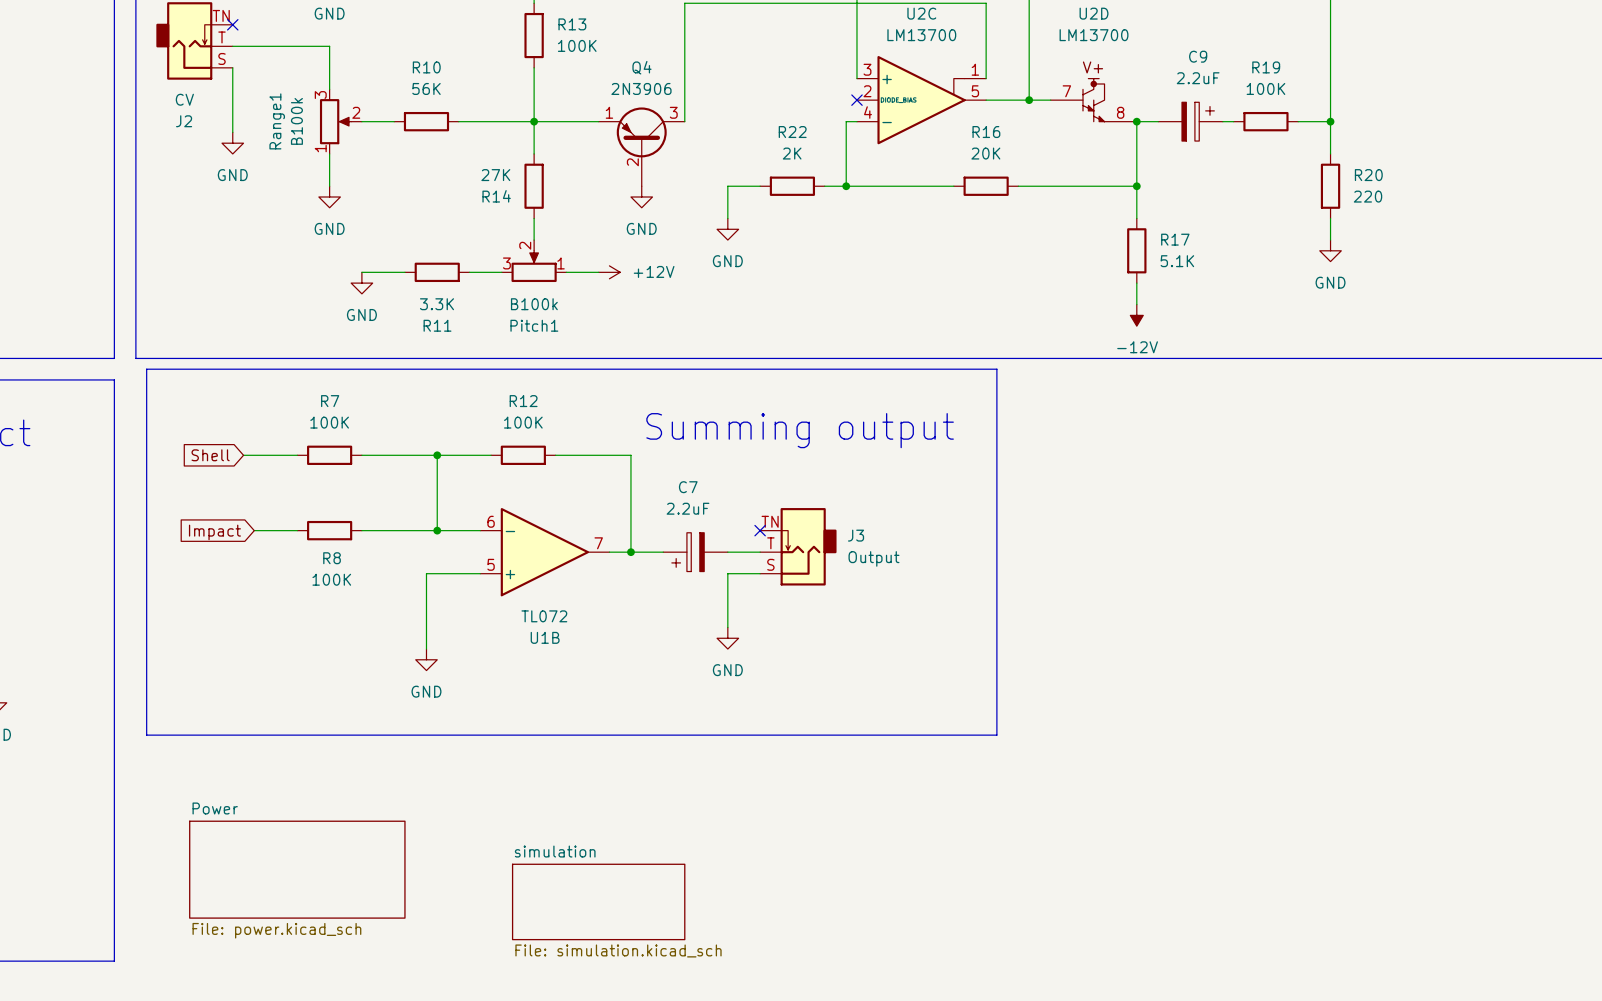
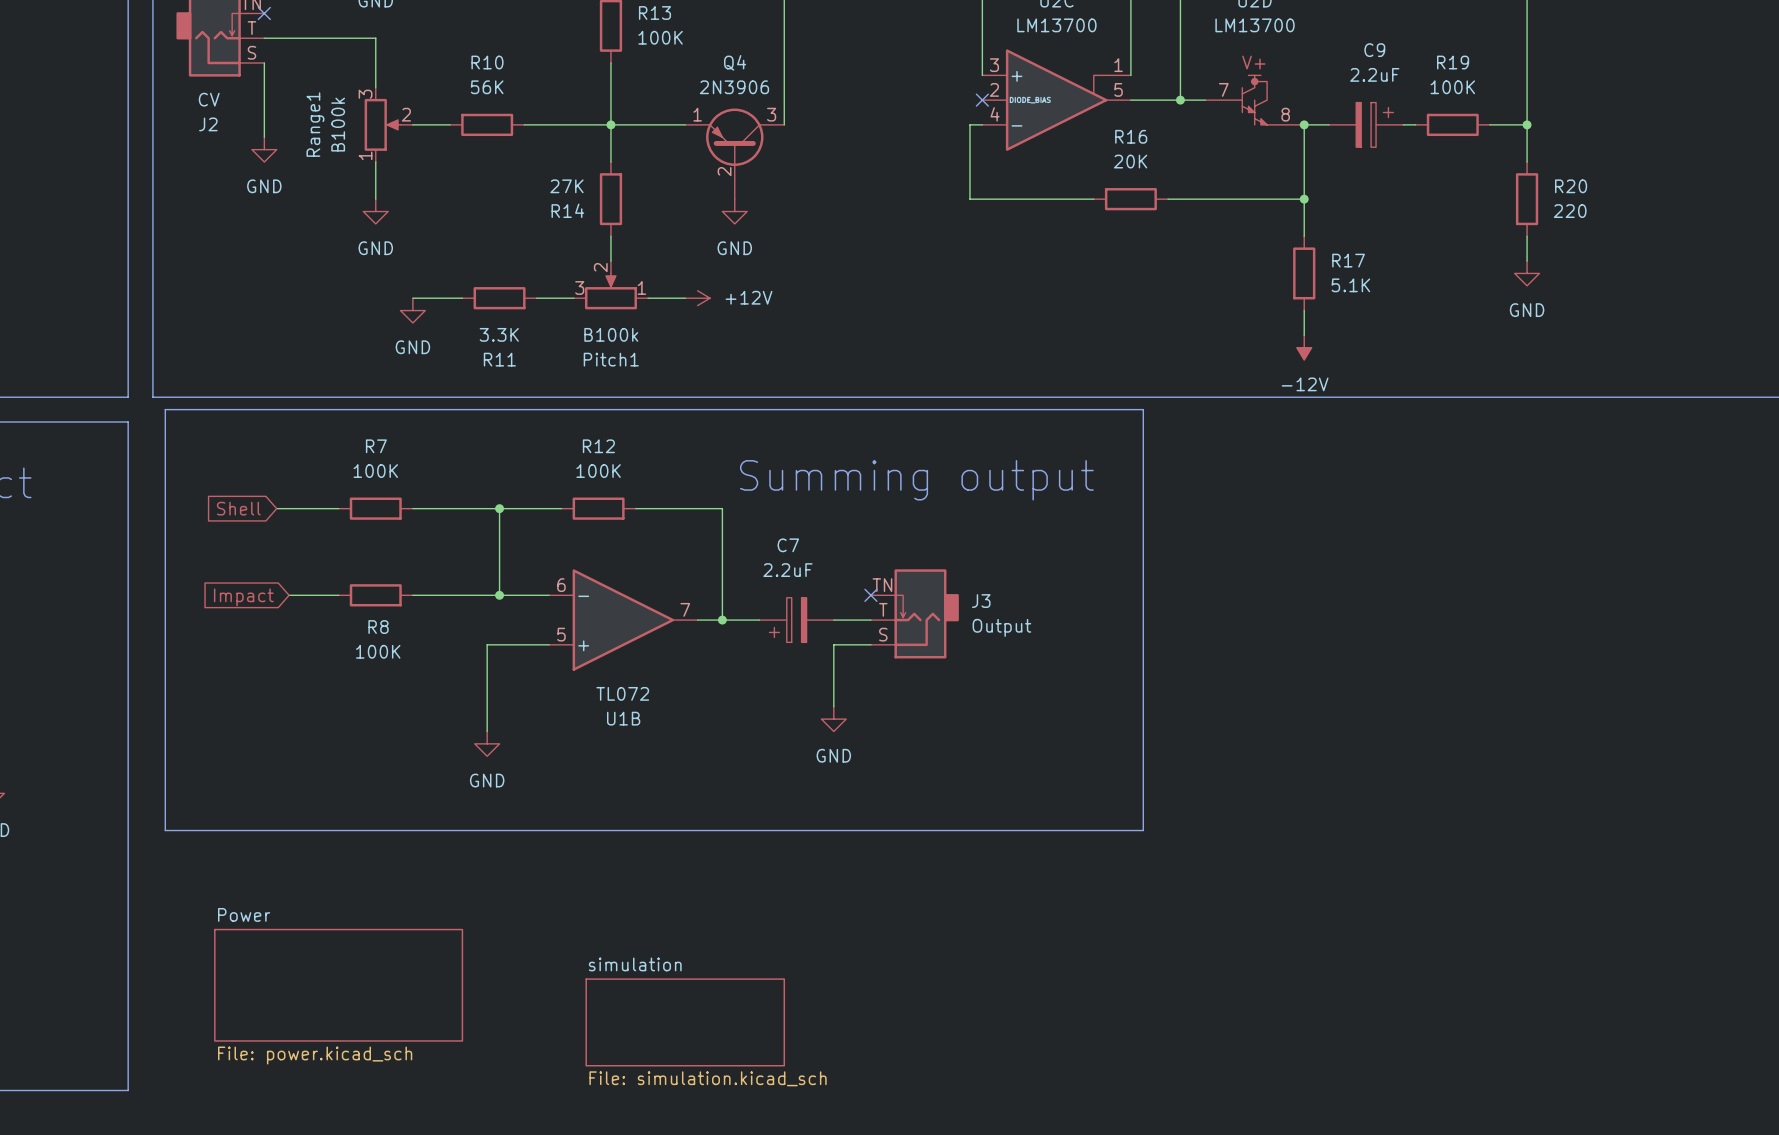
wire: (760, 186) (727, 186) (727, 218) -> none
R22: 2K (792, 186) -> none
wire: (824, 186) (846, 186) -> none
junction: (846, 186) -> none
power symbol: GND (727, 229) -> none

